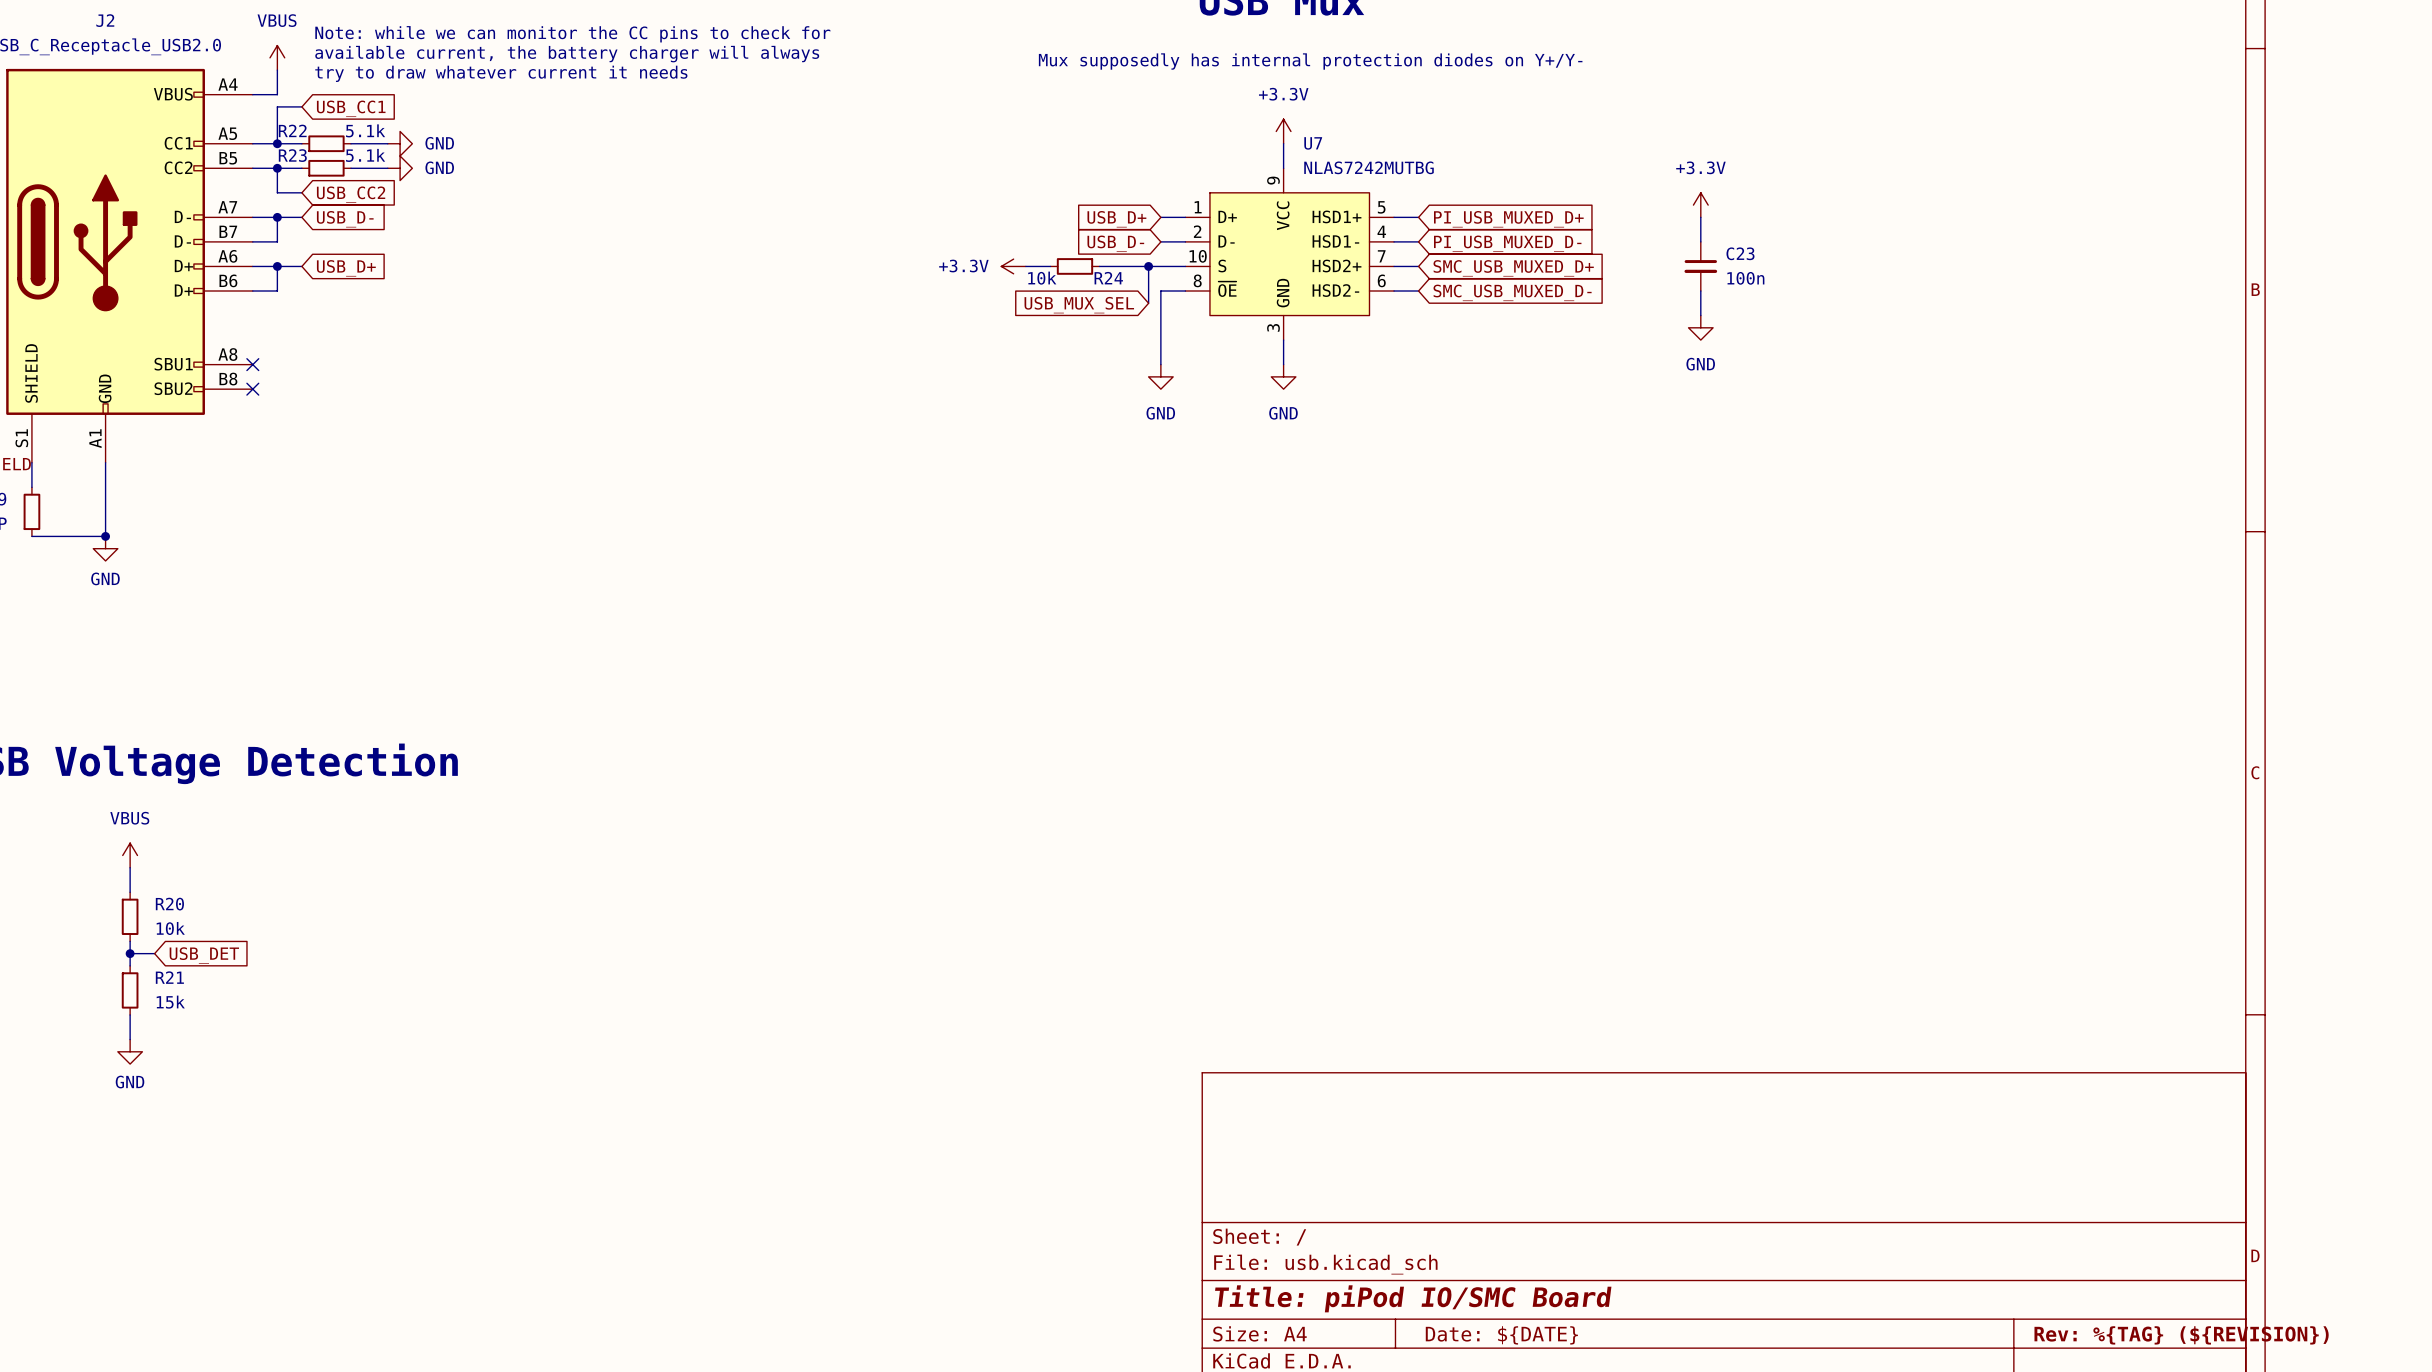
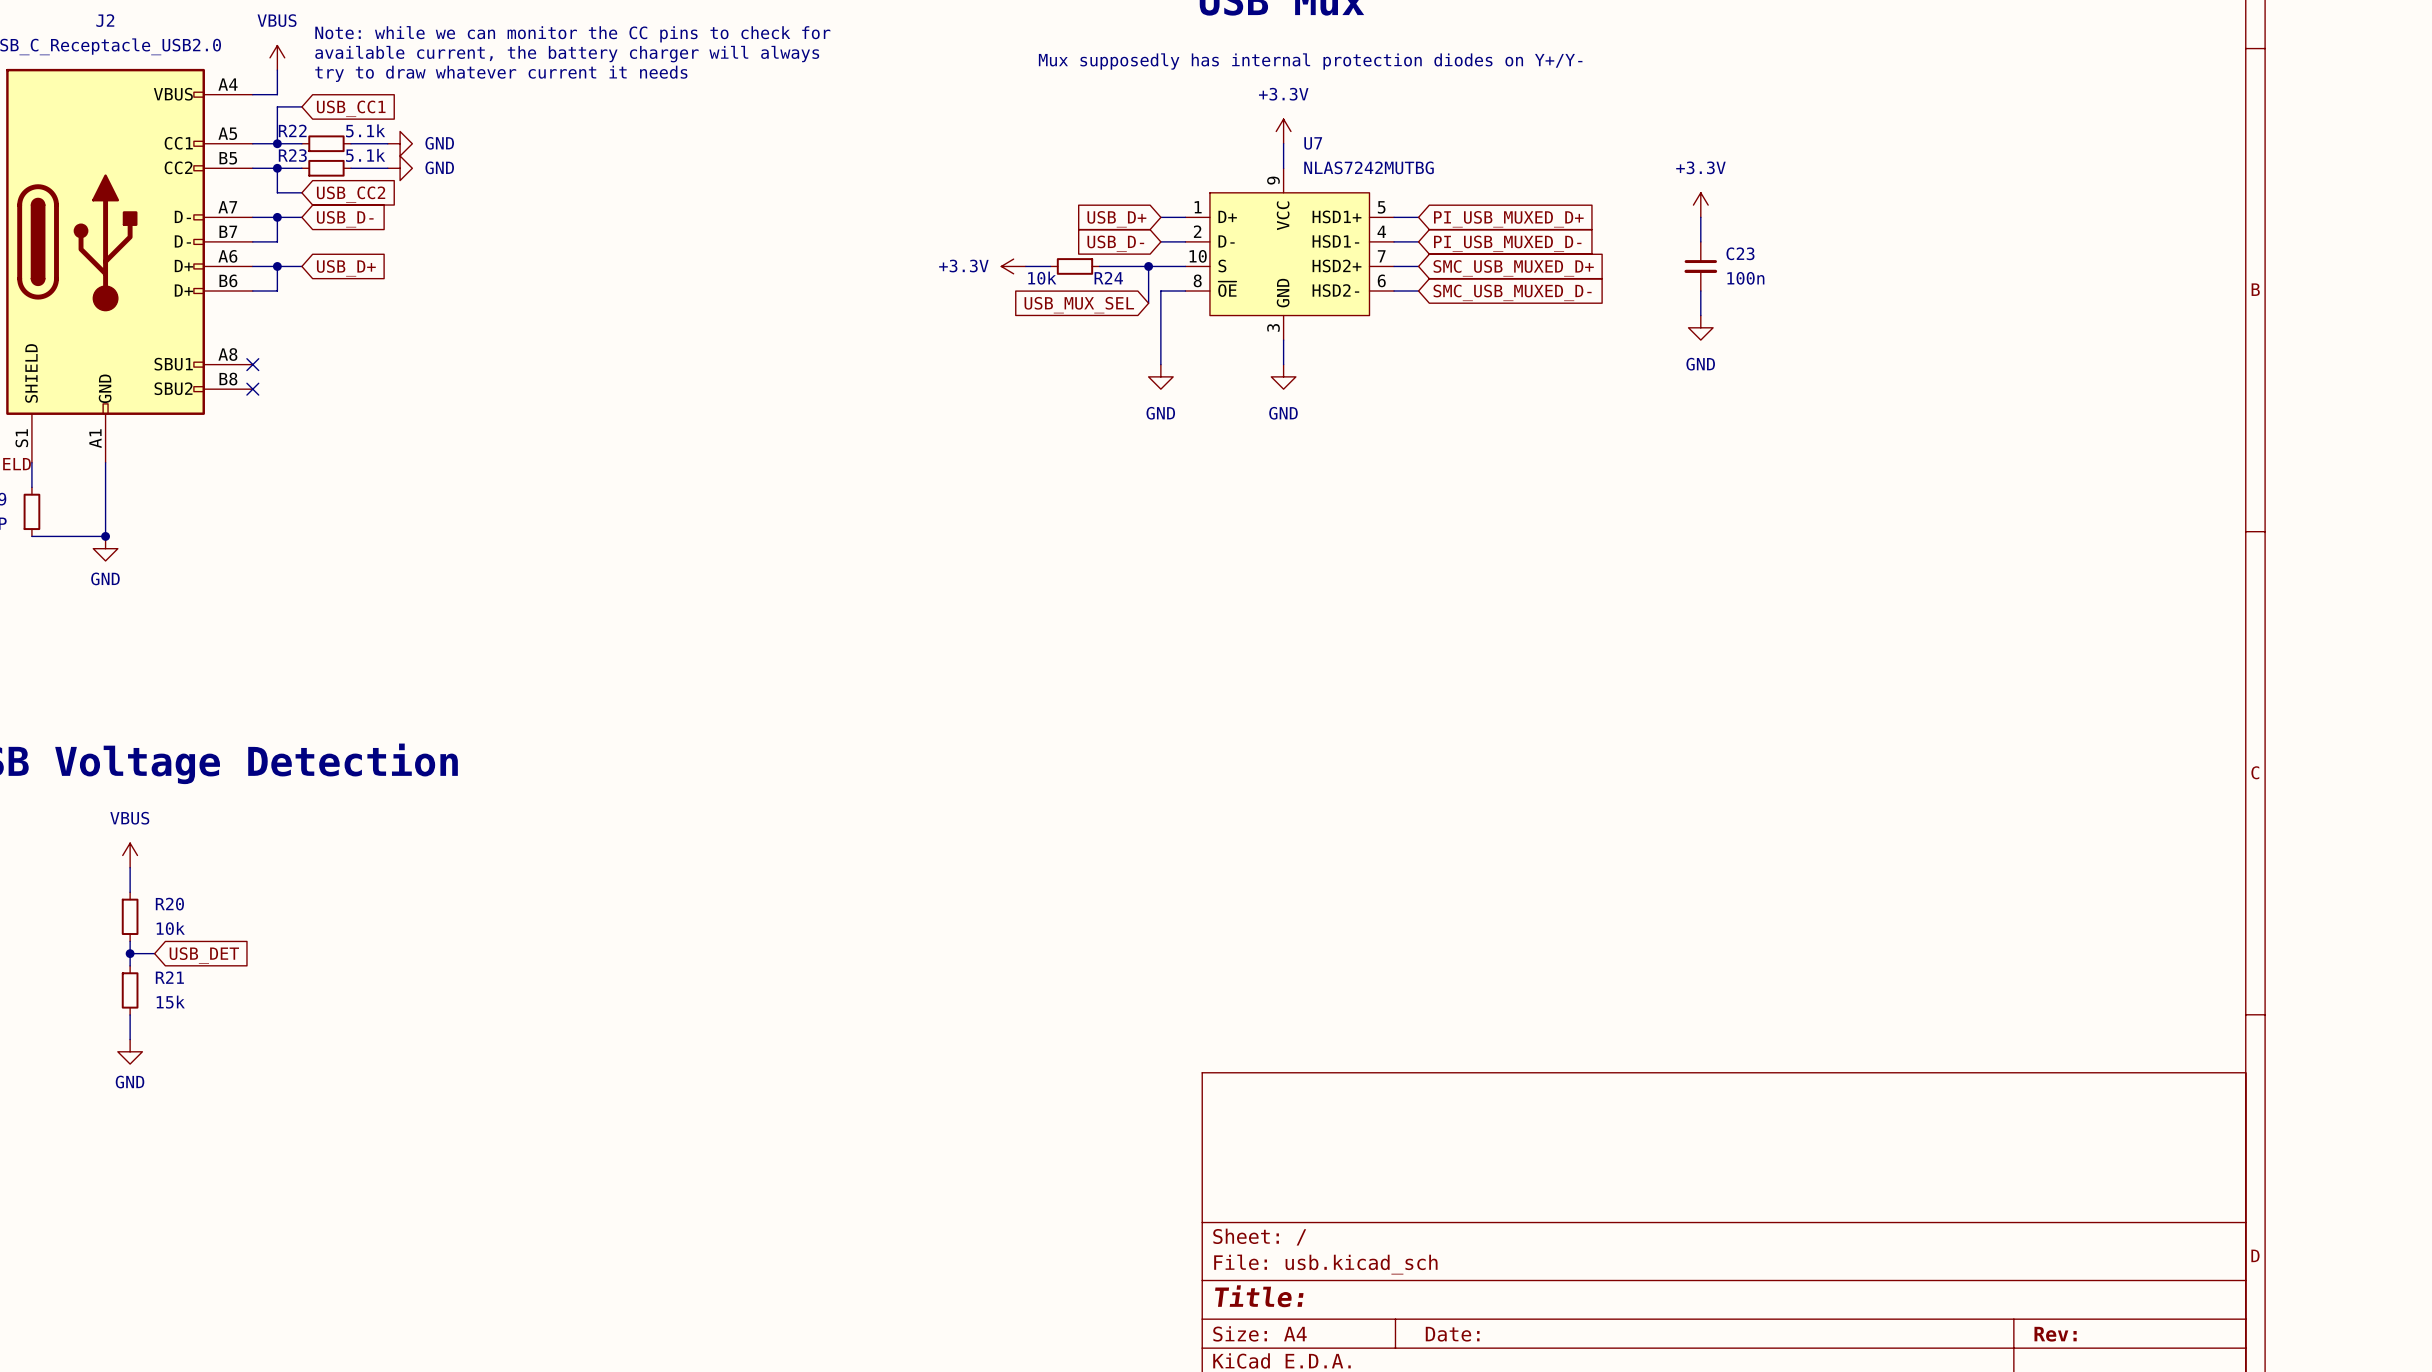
title block: Title: piPod IO/SMC Board (1413, 1298) -> Title: (1259, 1296)
title block: Date: ${DATE} (1501, 1335) -> Date: (1452, 1334)
title block: Rev: %{TAG} (${REVISION}) (2181, 1335) -> Rev: (2055, 1334)

